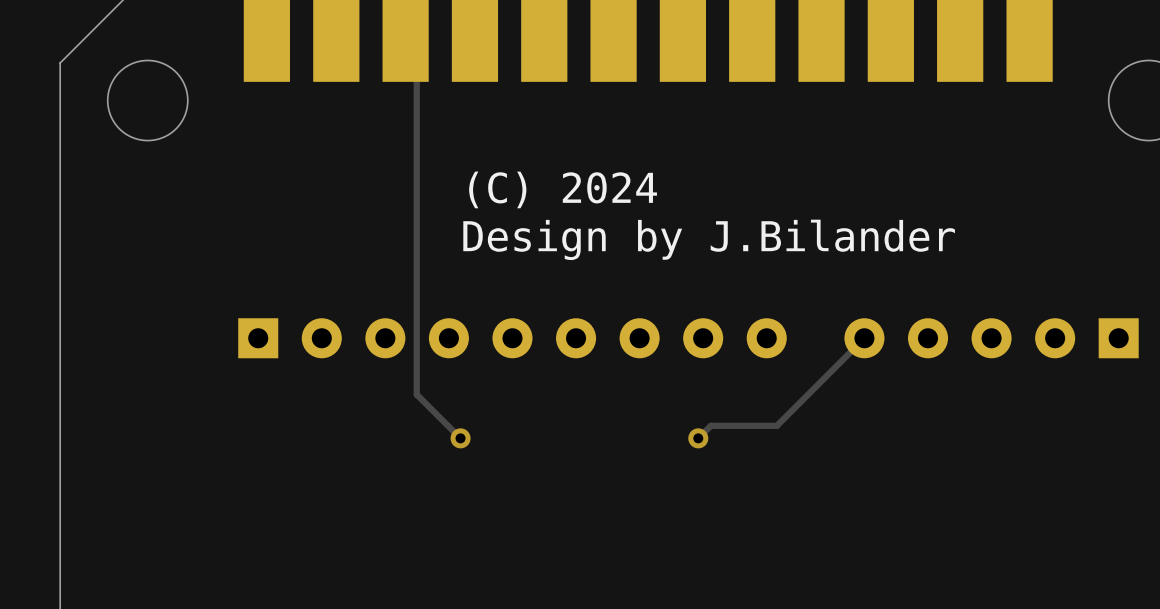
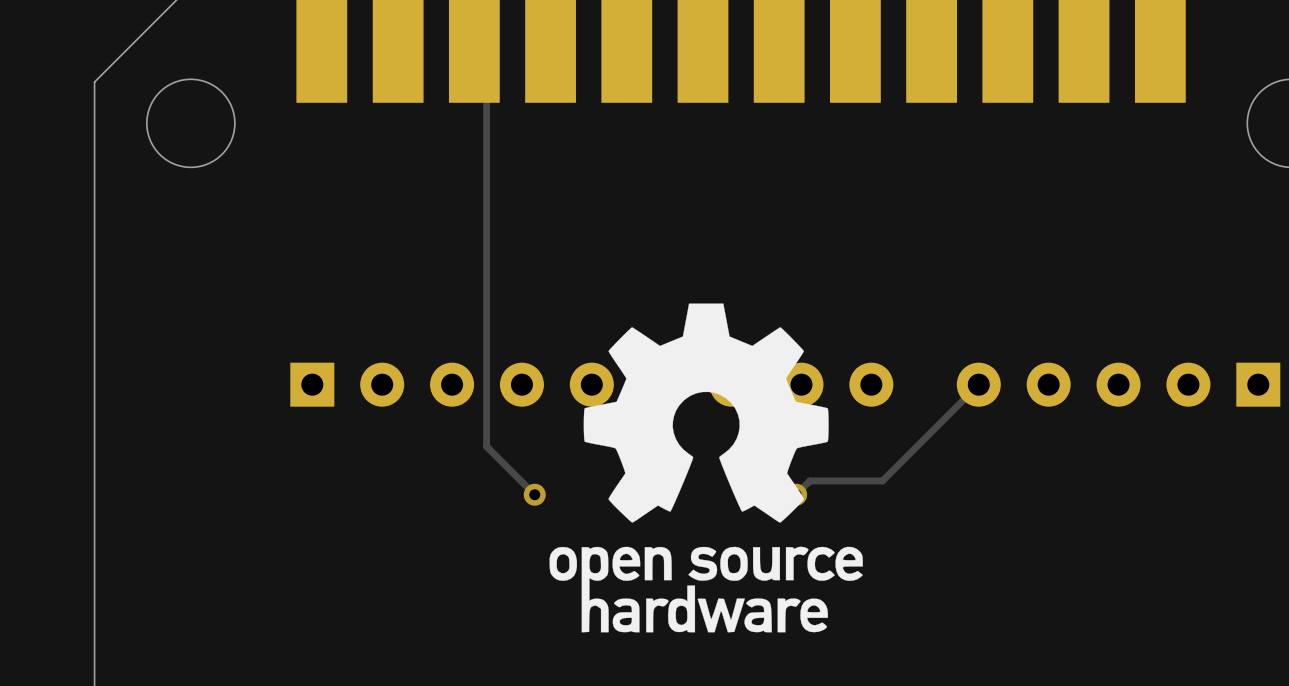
text: (C) 2024 (563, 189) -> none
text: Design by J.Bilander (709, 239) -> none
drawing: none -> [549, 303, 863, 633]

